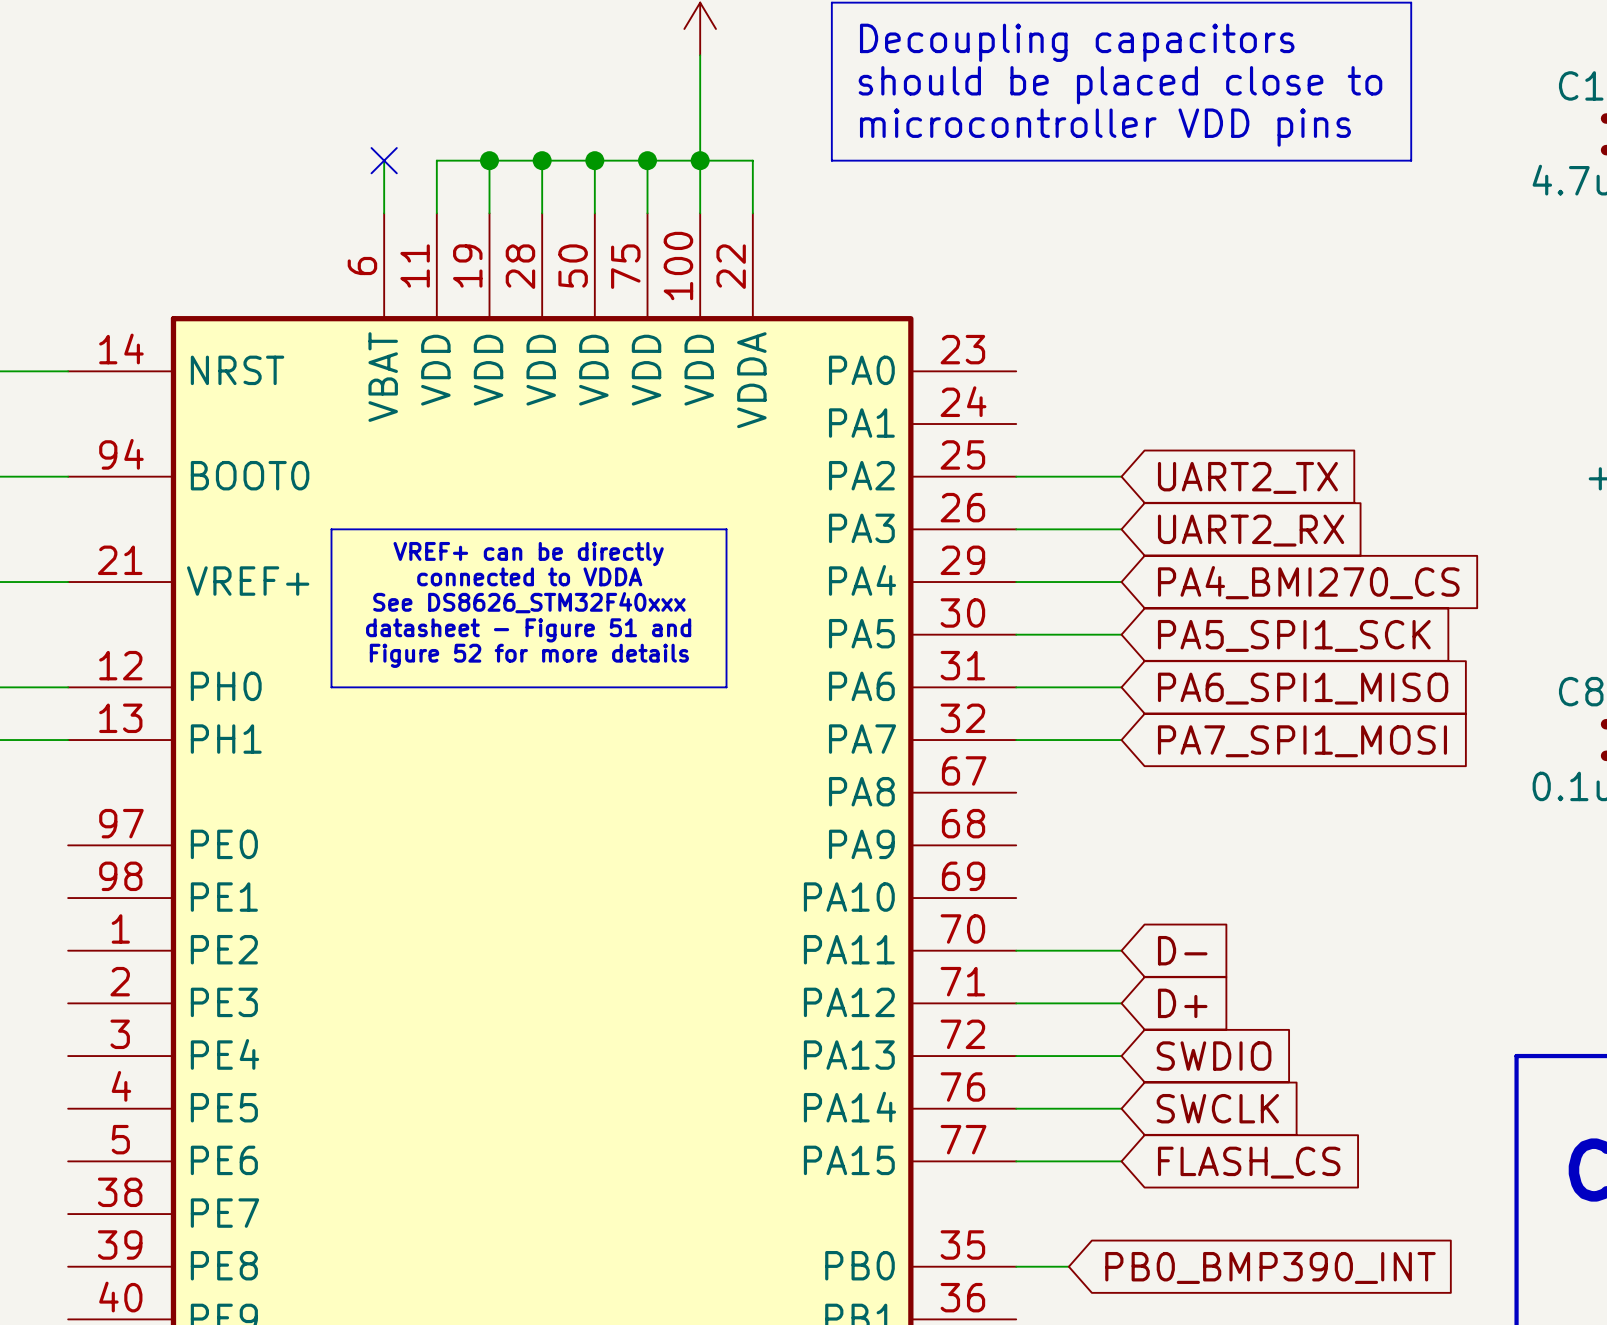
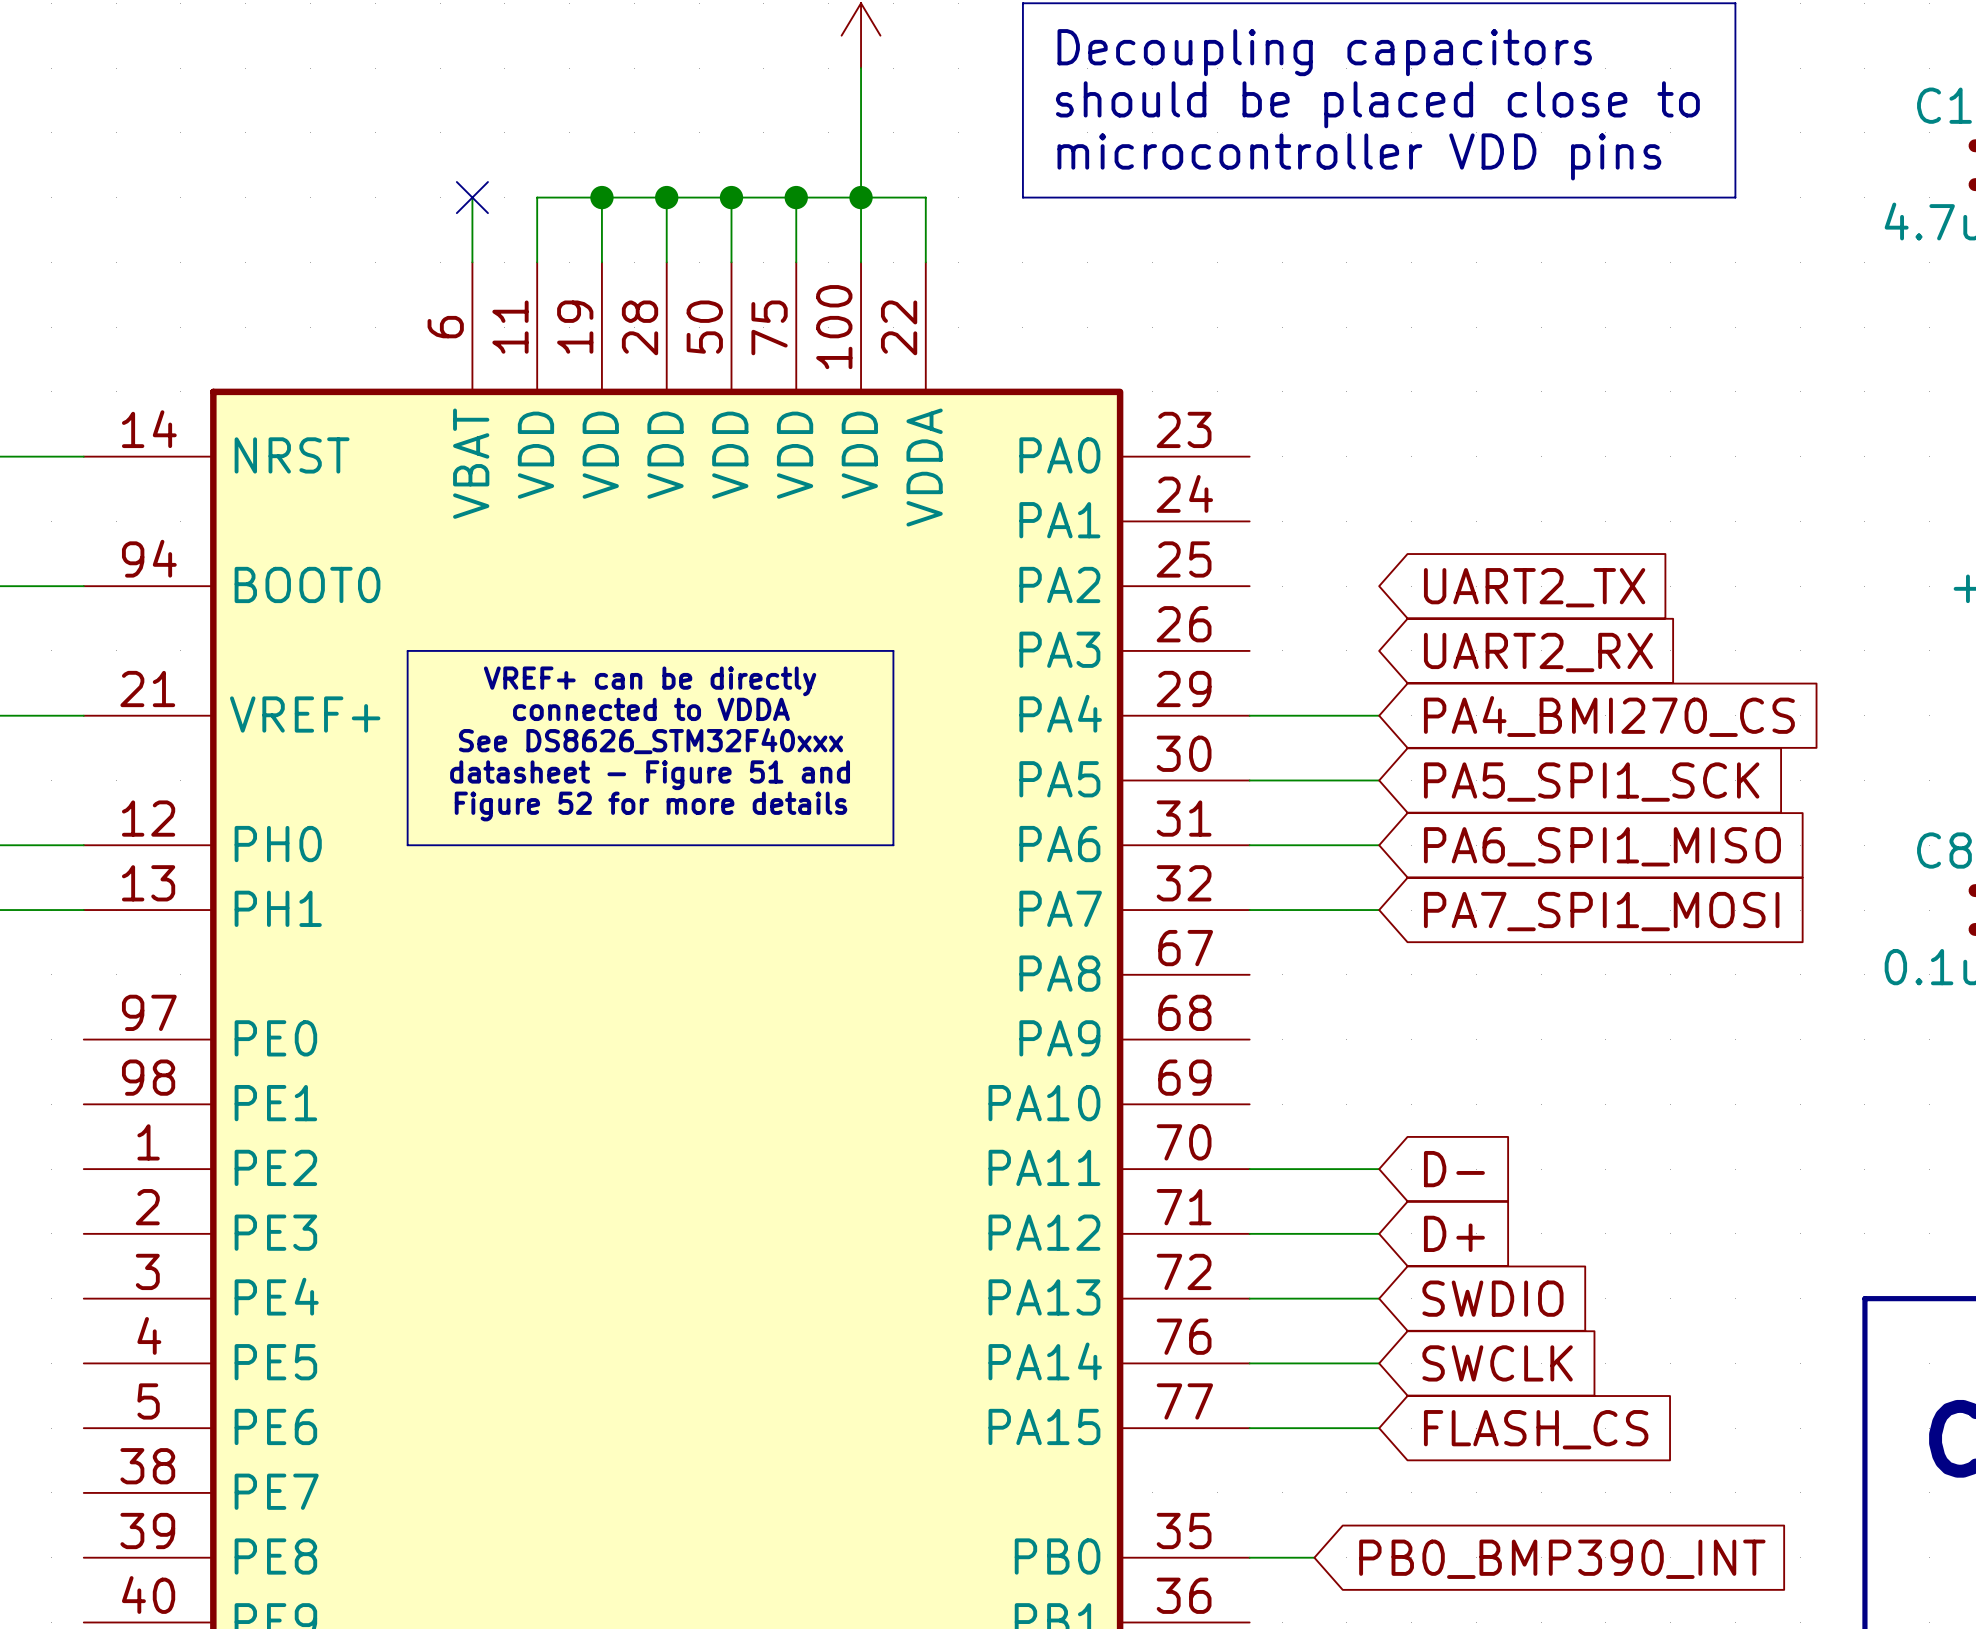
wire: (1016, 476) (1121, 476) -> none
wire: (1016, 529) (1121, 529) -> none

